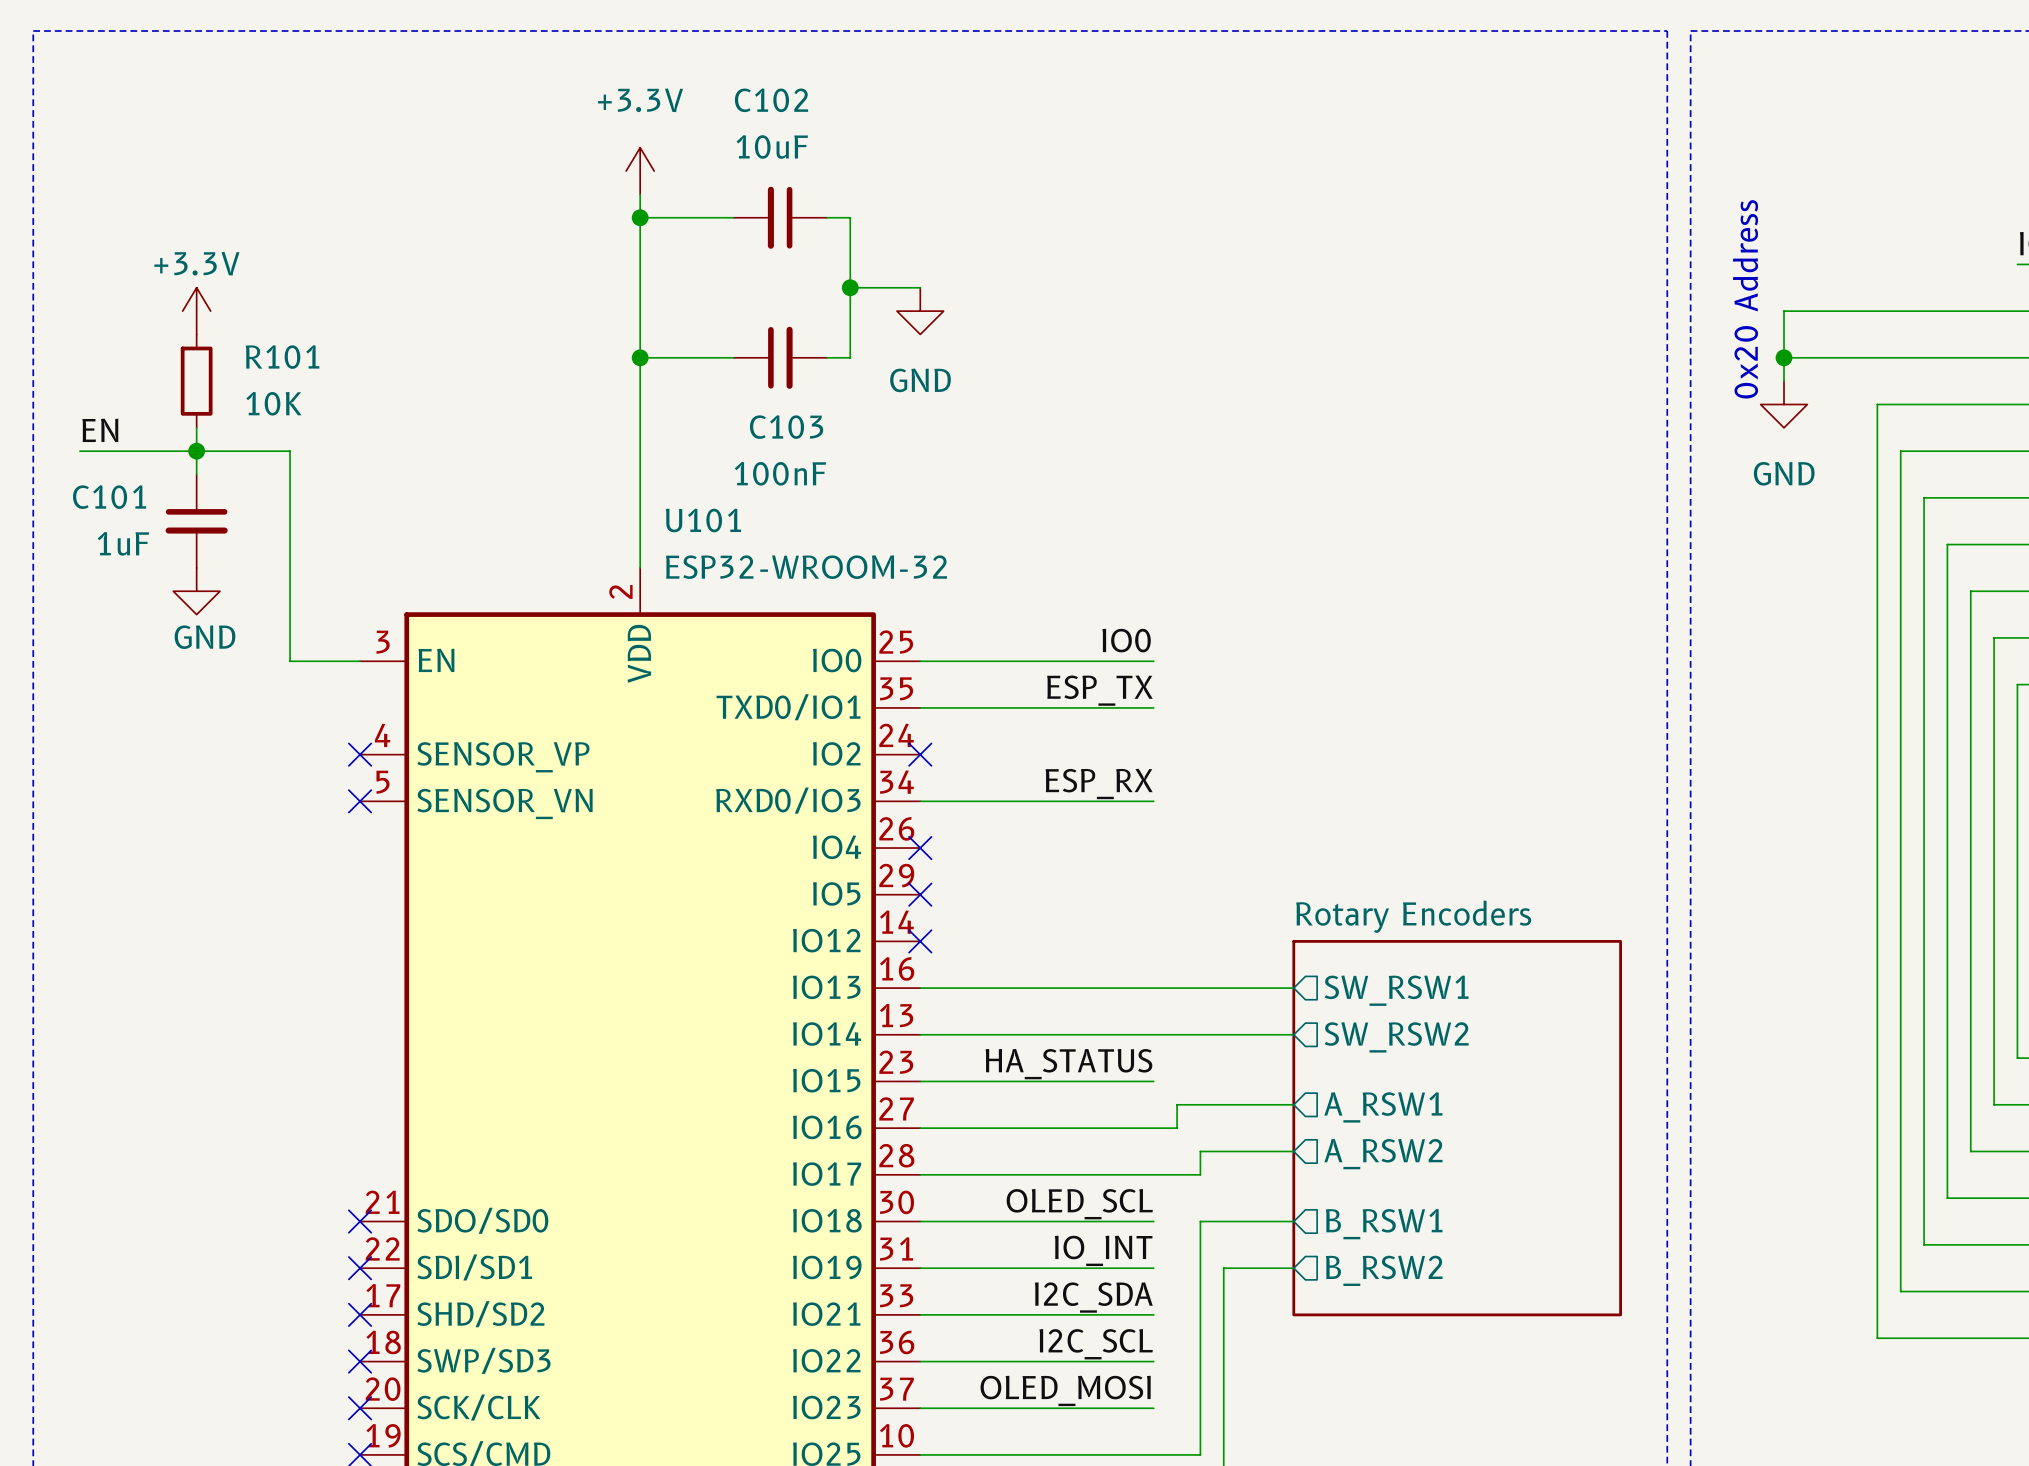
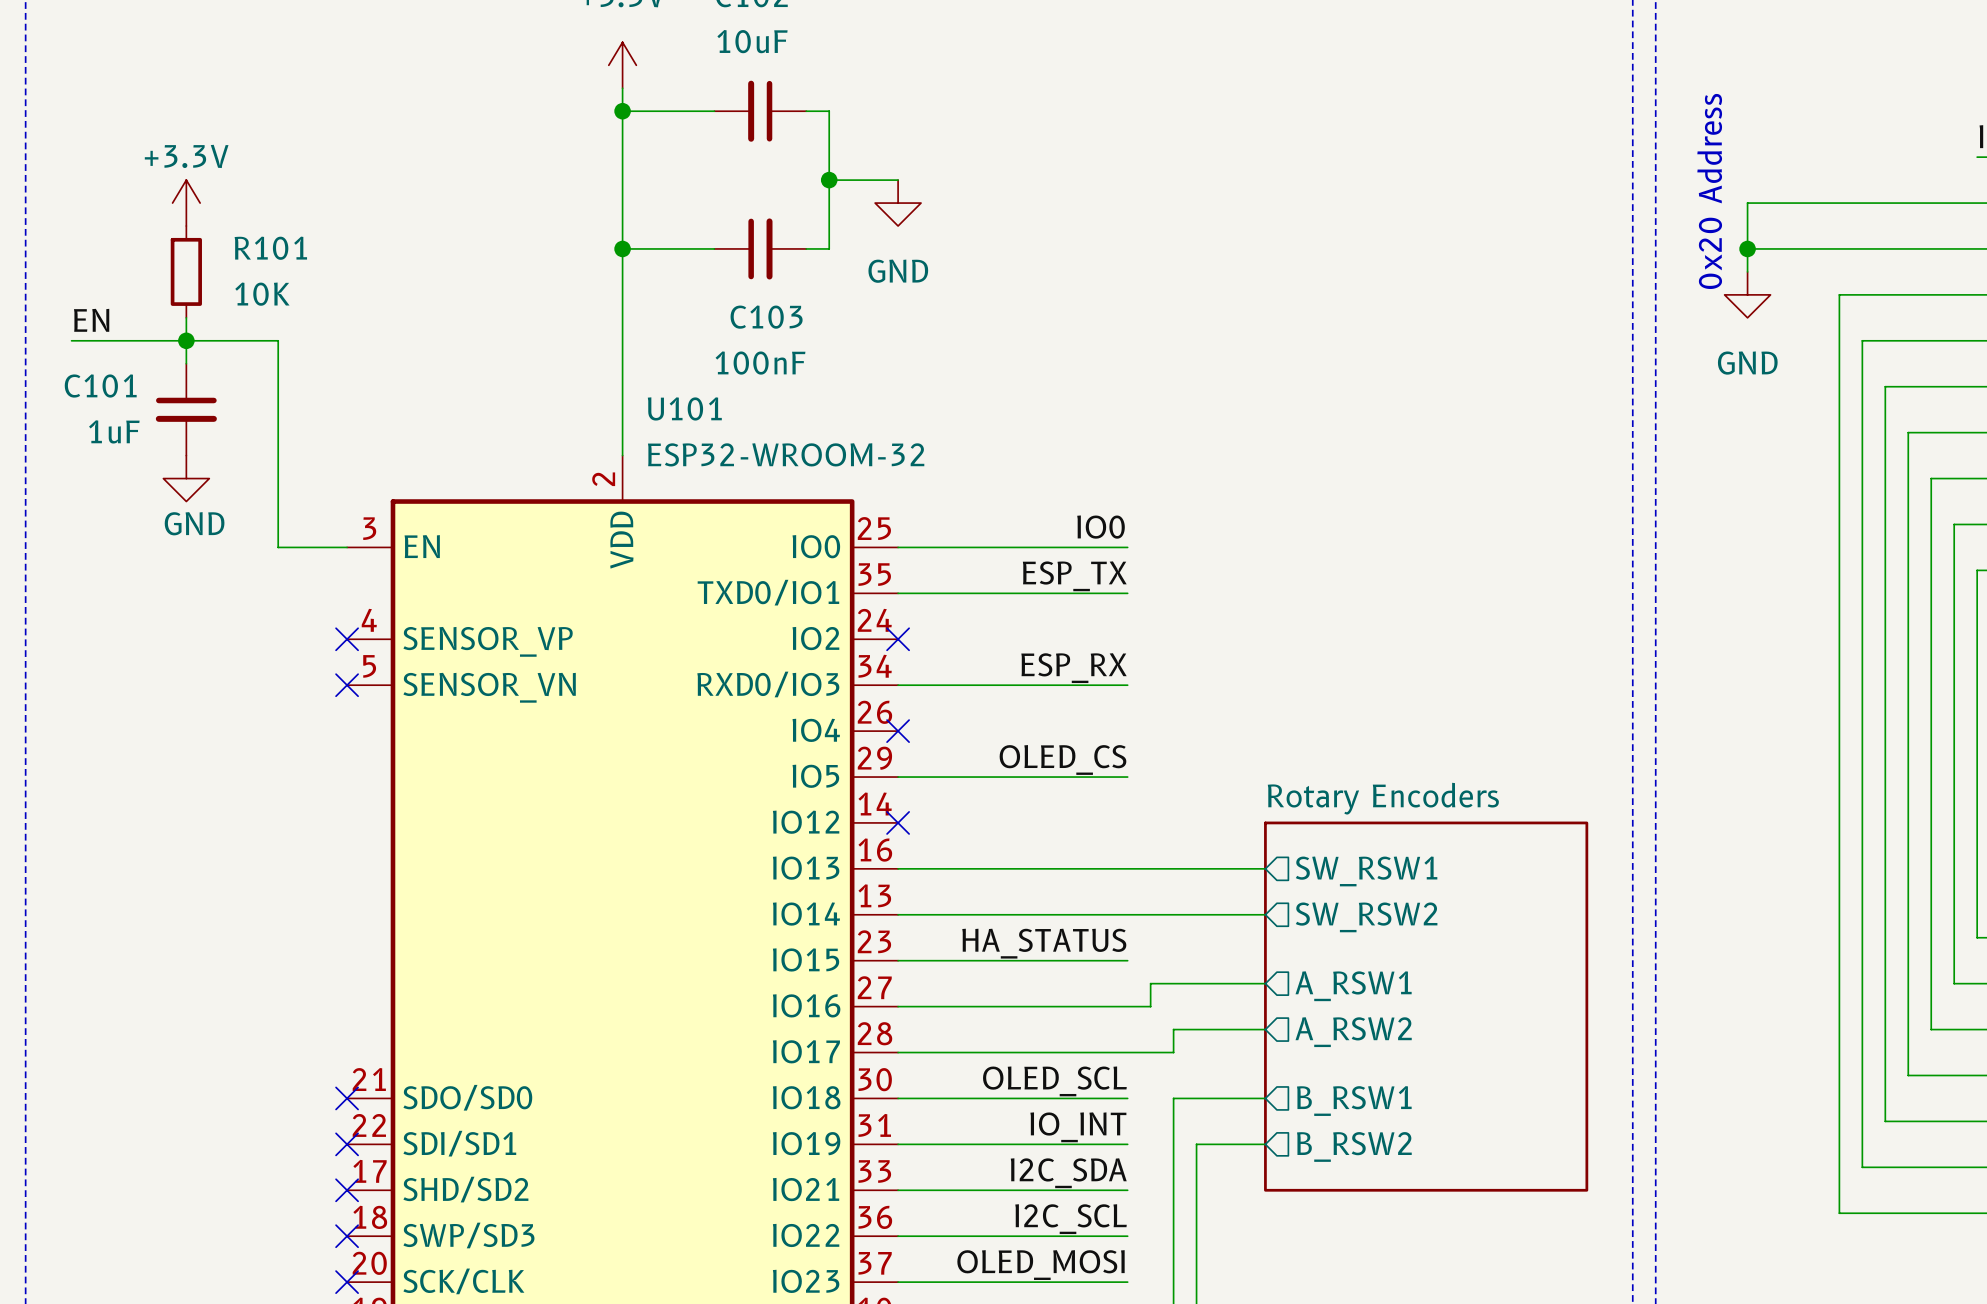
label: none -> OLED_CS (1062, 759)
wire: none -> (898, 777) (1127, 777)
no-connect mark: (920, 894) -> none

